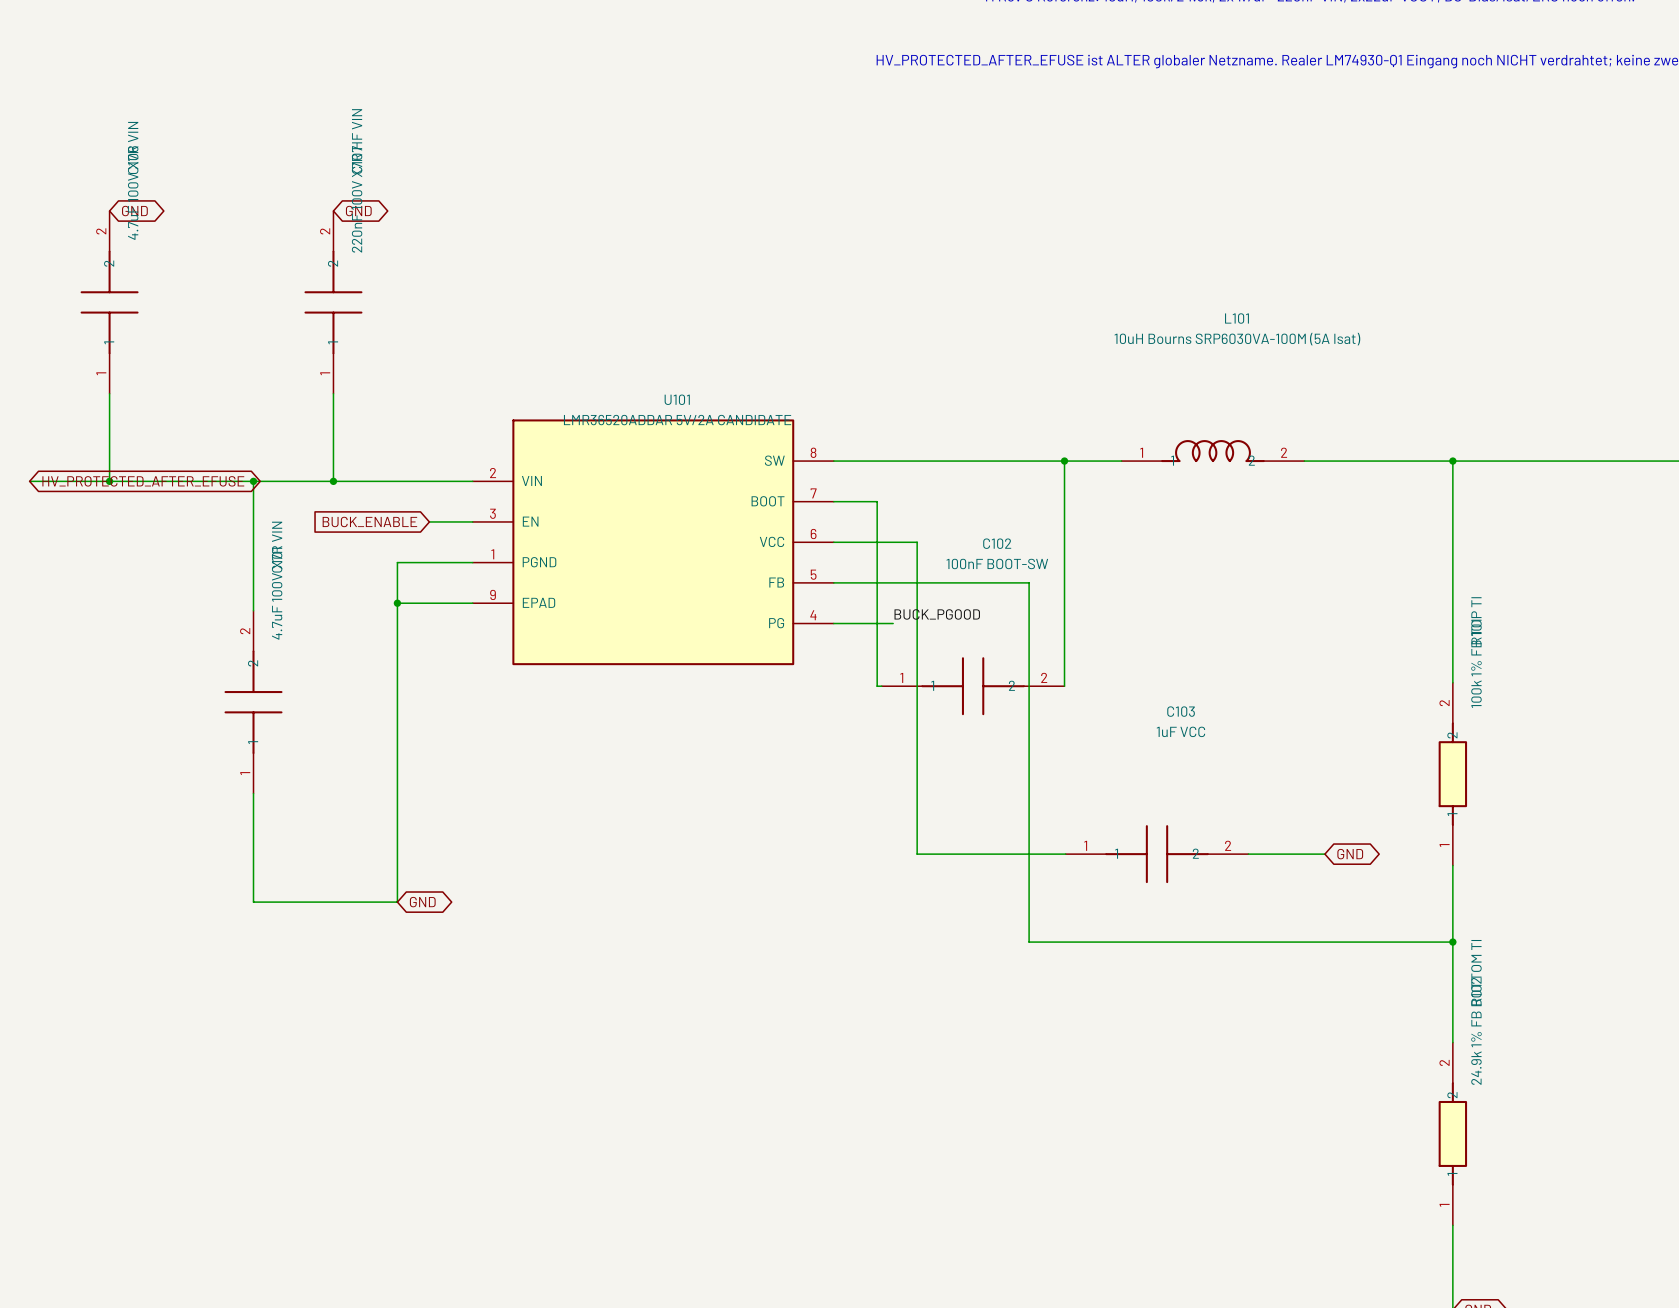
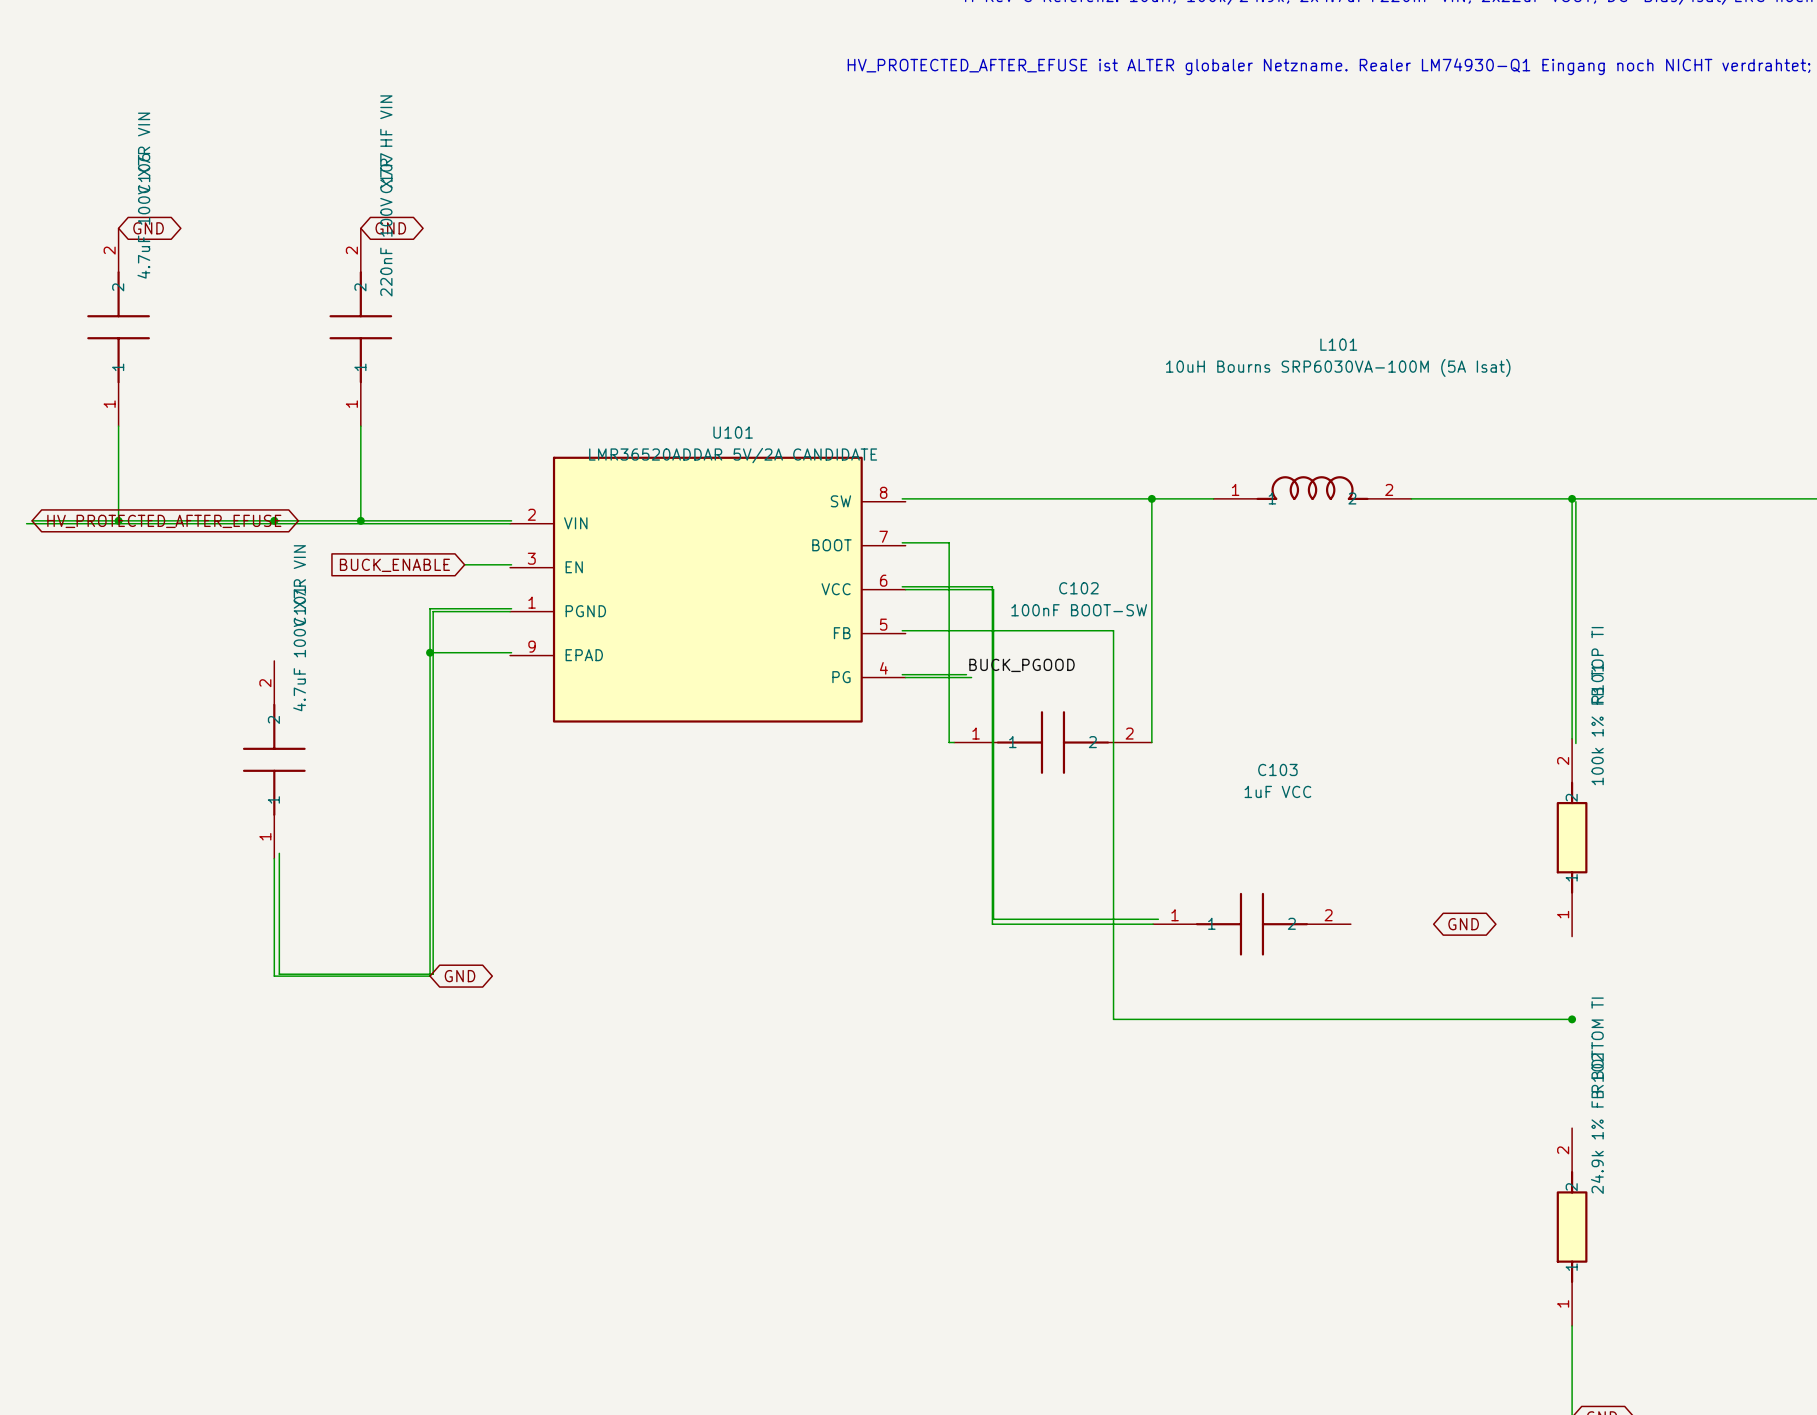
U101 symbol: [472, 419, 834, 666] -> [510, 456, 906, 723]
wire: none -> (1575, 501) (1575, 743)
wire: (253, 481) (253, 610) -> none
wire: none -> (26, 523) (510, 523)
wire: none -> (905, 589) (993, 589) (993, 919) (1158, 919)
wire: none -> (510, 611) (433, 611) (433, 974) (279, 974) (279, 853)
wire: none -> (905, 677) (971, 677)
wire: (1248, 854) (1324, 854) -> none
wire: (1452, 865) (1452, 1042) -> none

